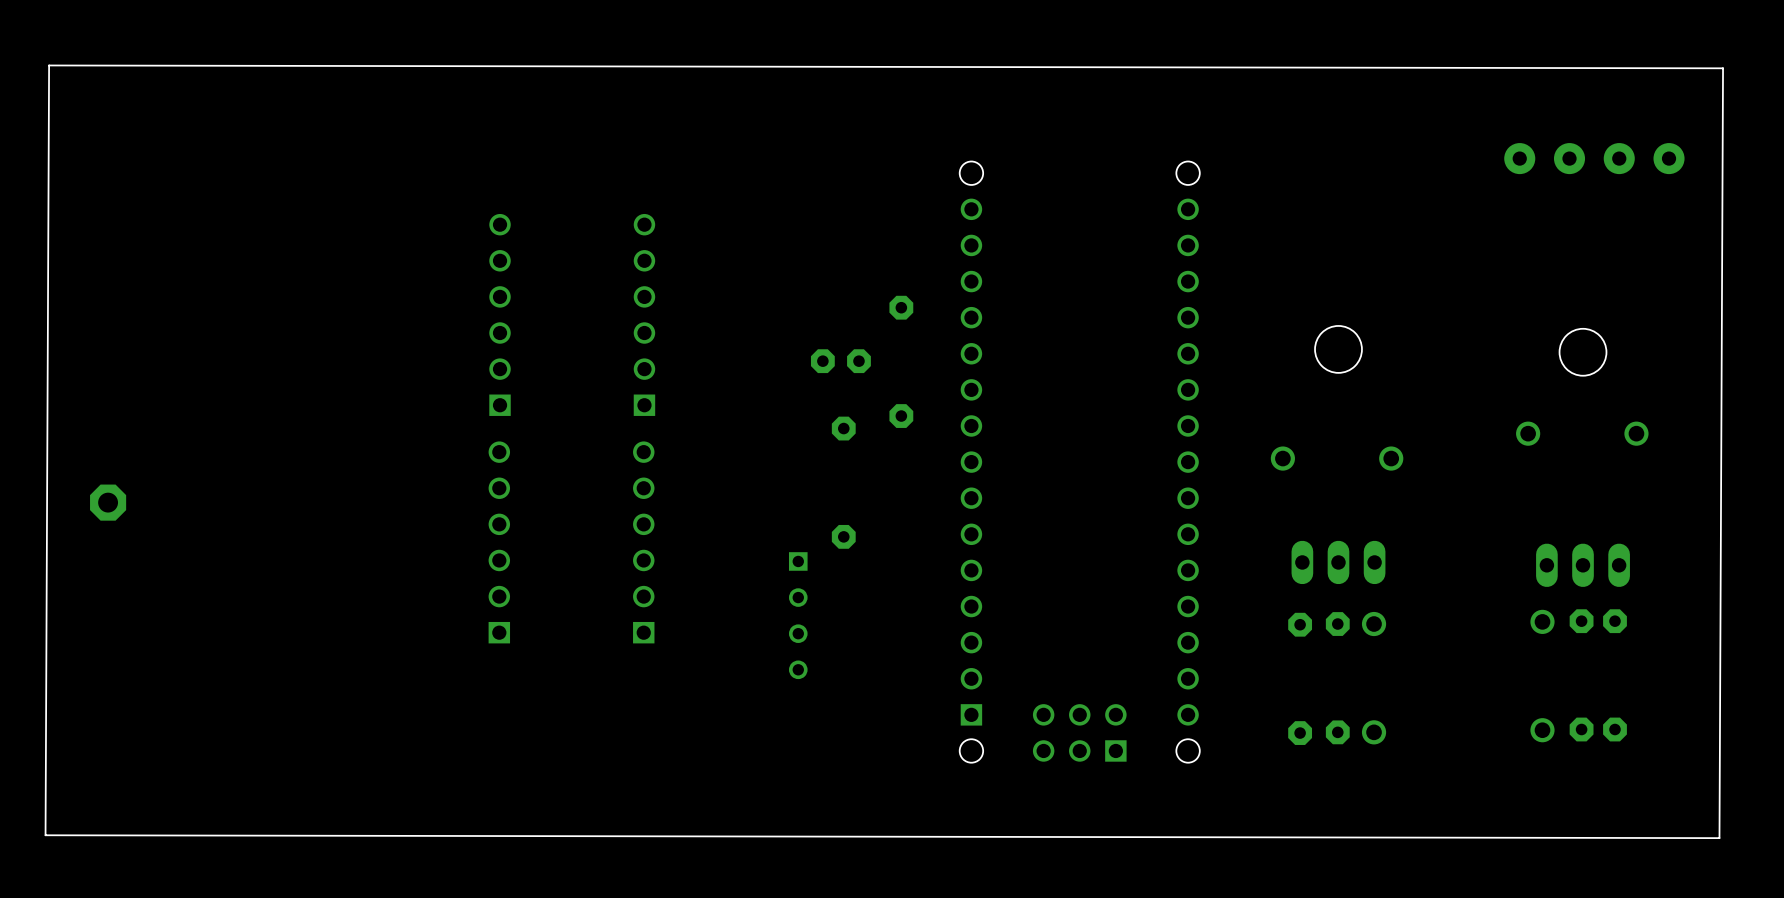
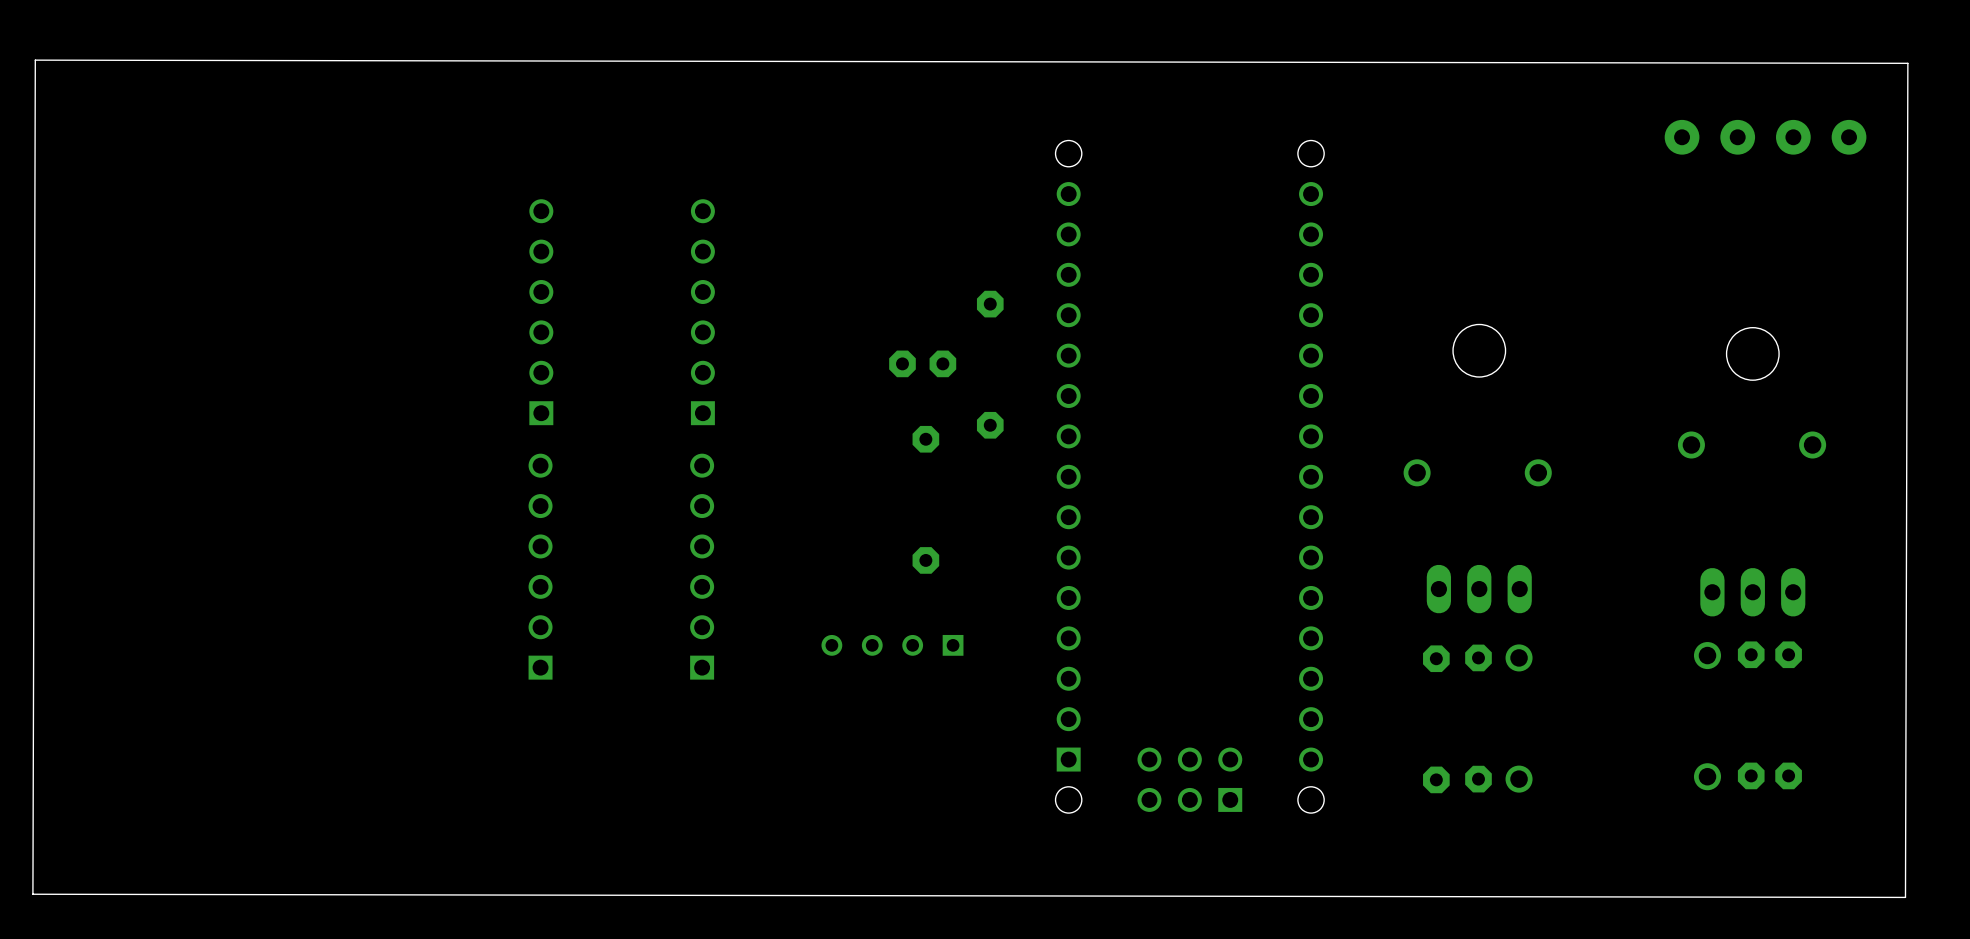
part: (108, 502) -> none
part rotation: 0° (798, 615) -> 90° clockwise (892, 645)
board edge: (45, 835) (49, 65) (1723, 68) (1719, 838) -> (32, 894) (35, 60) (1907, 63) (1905, 897)

